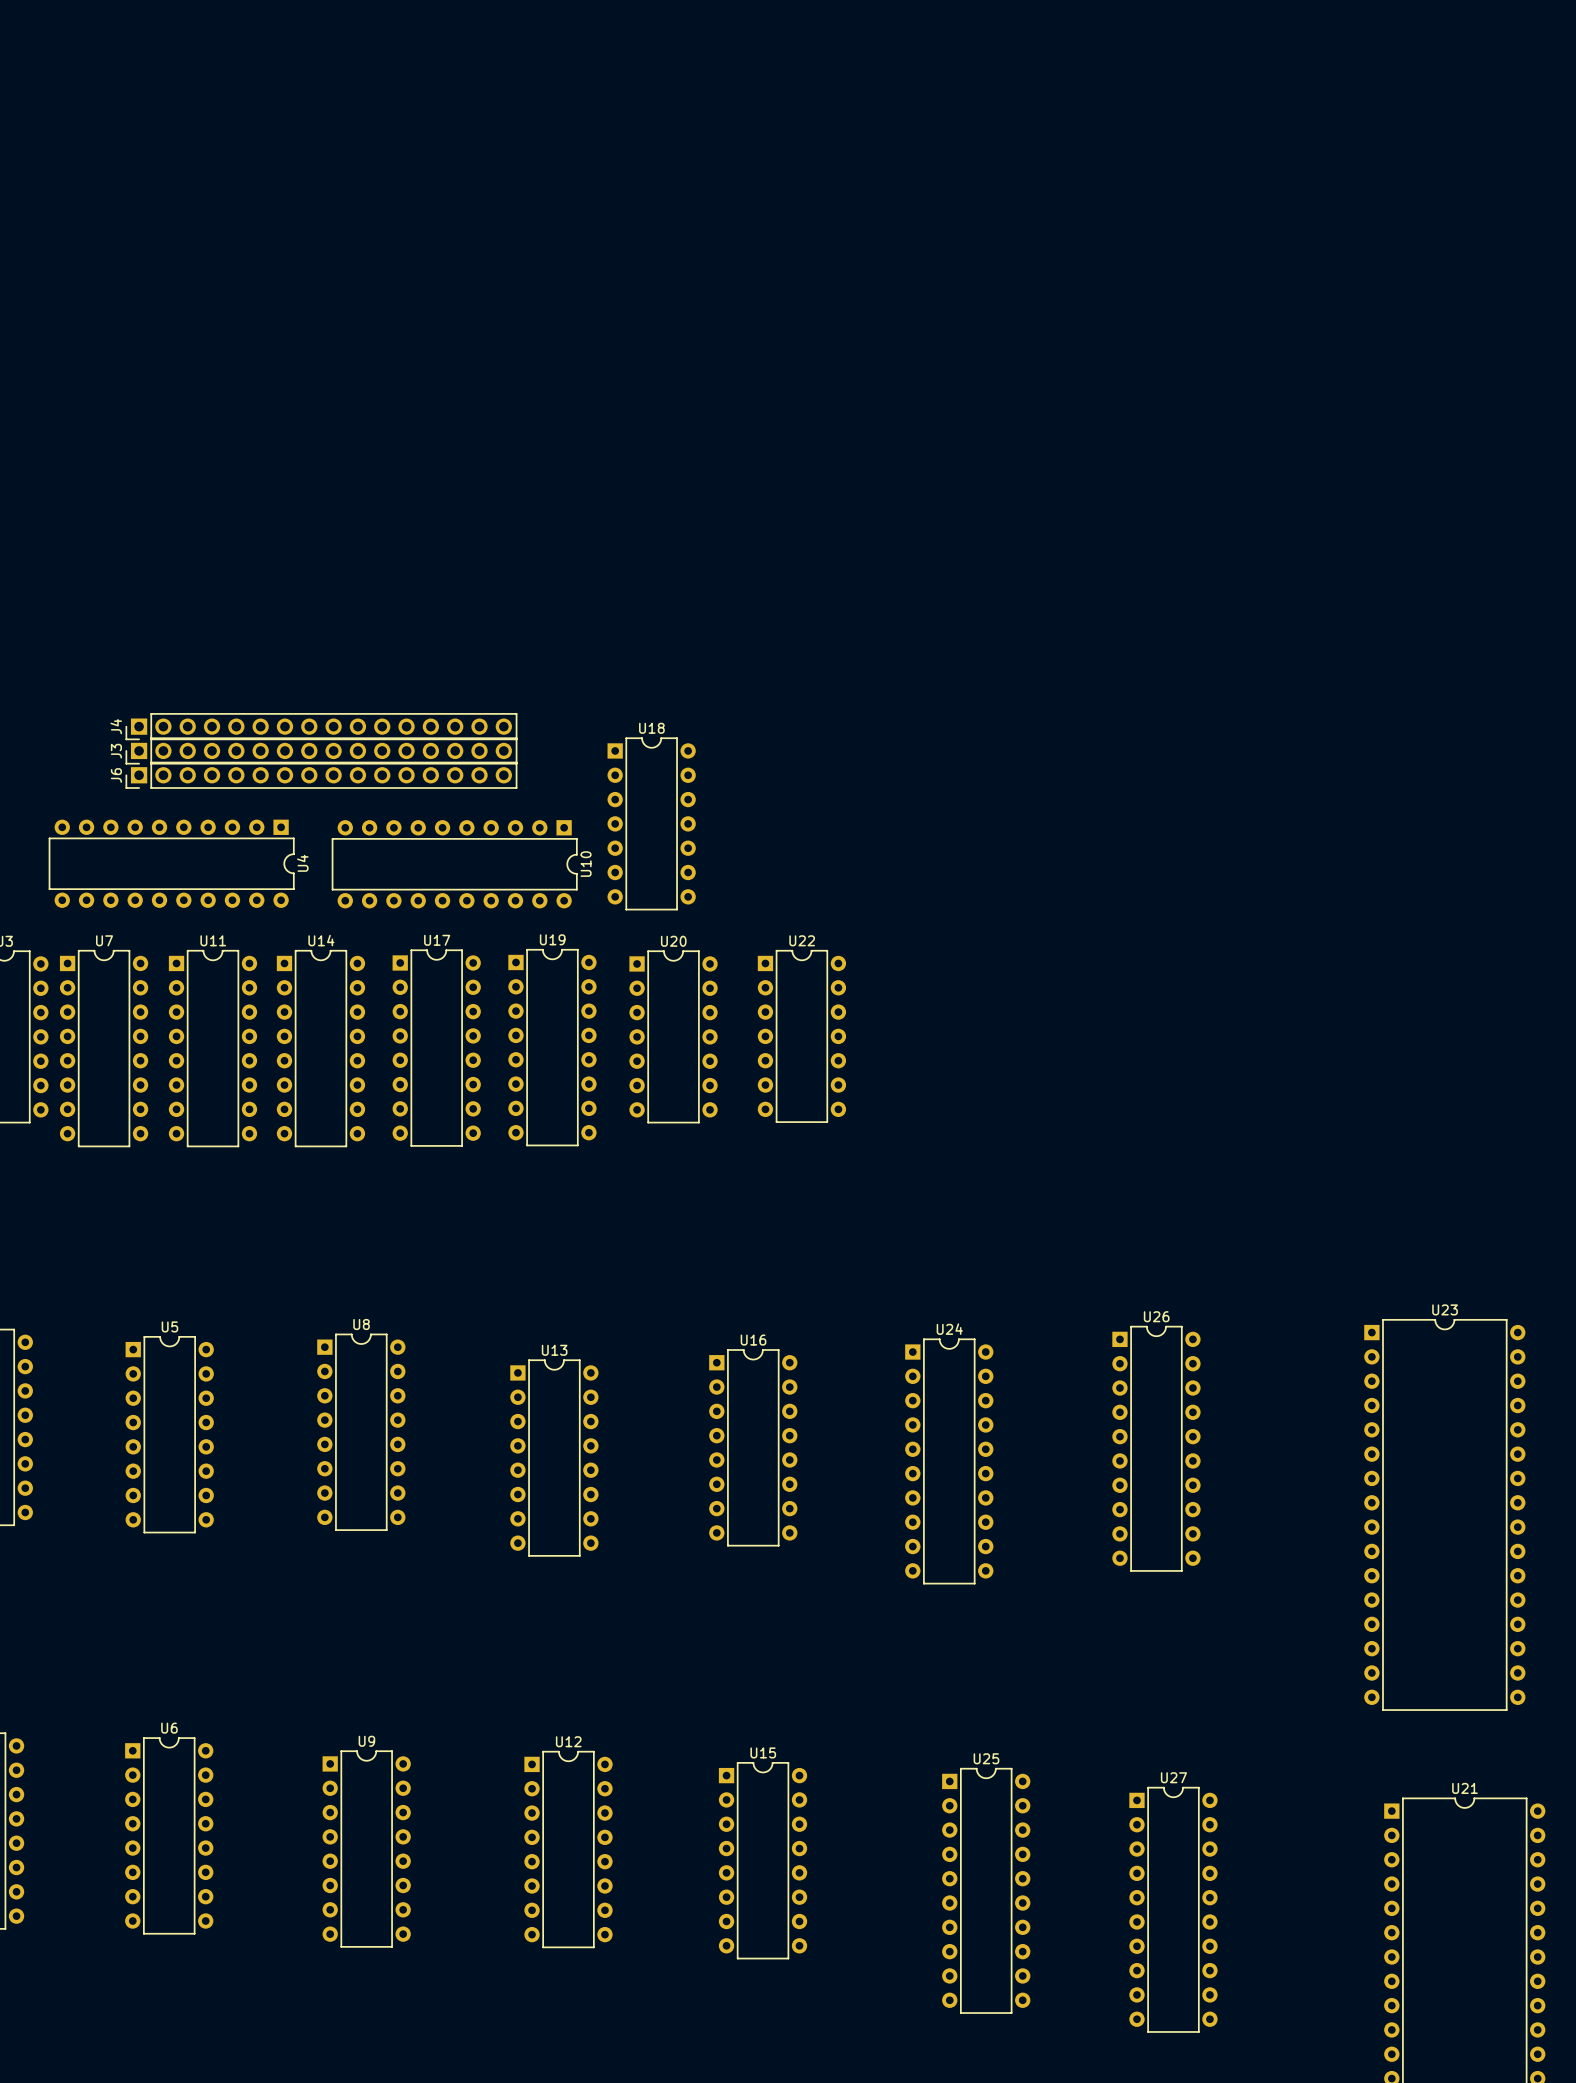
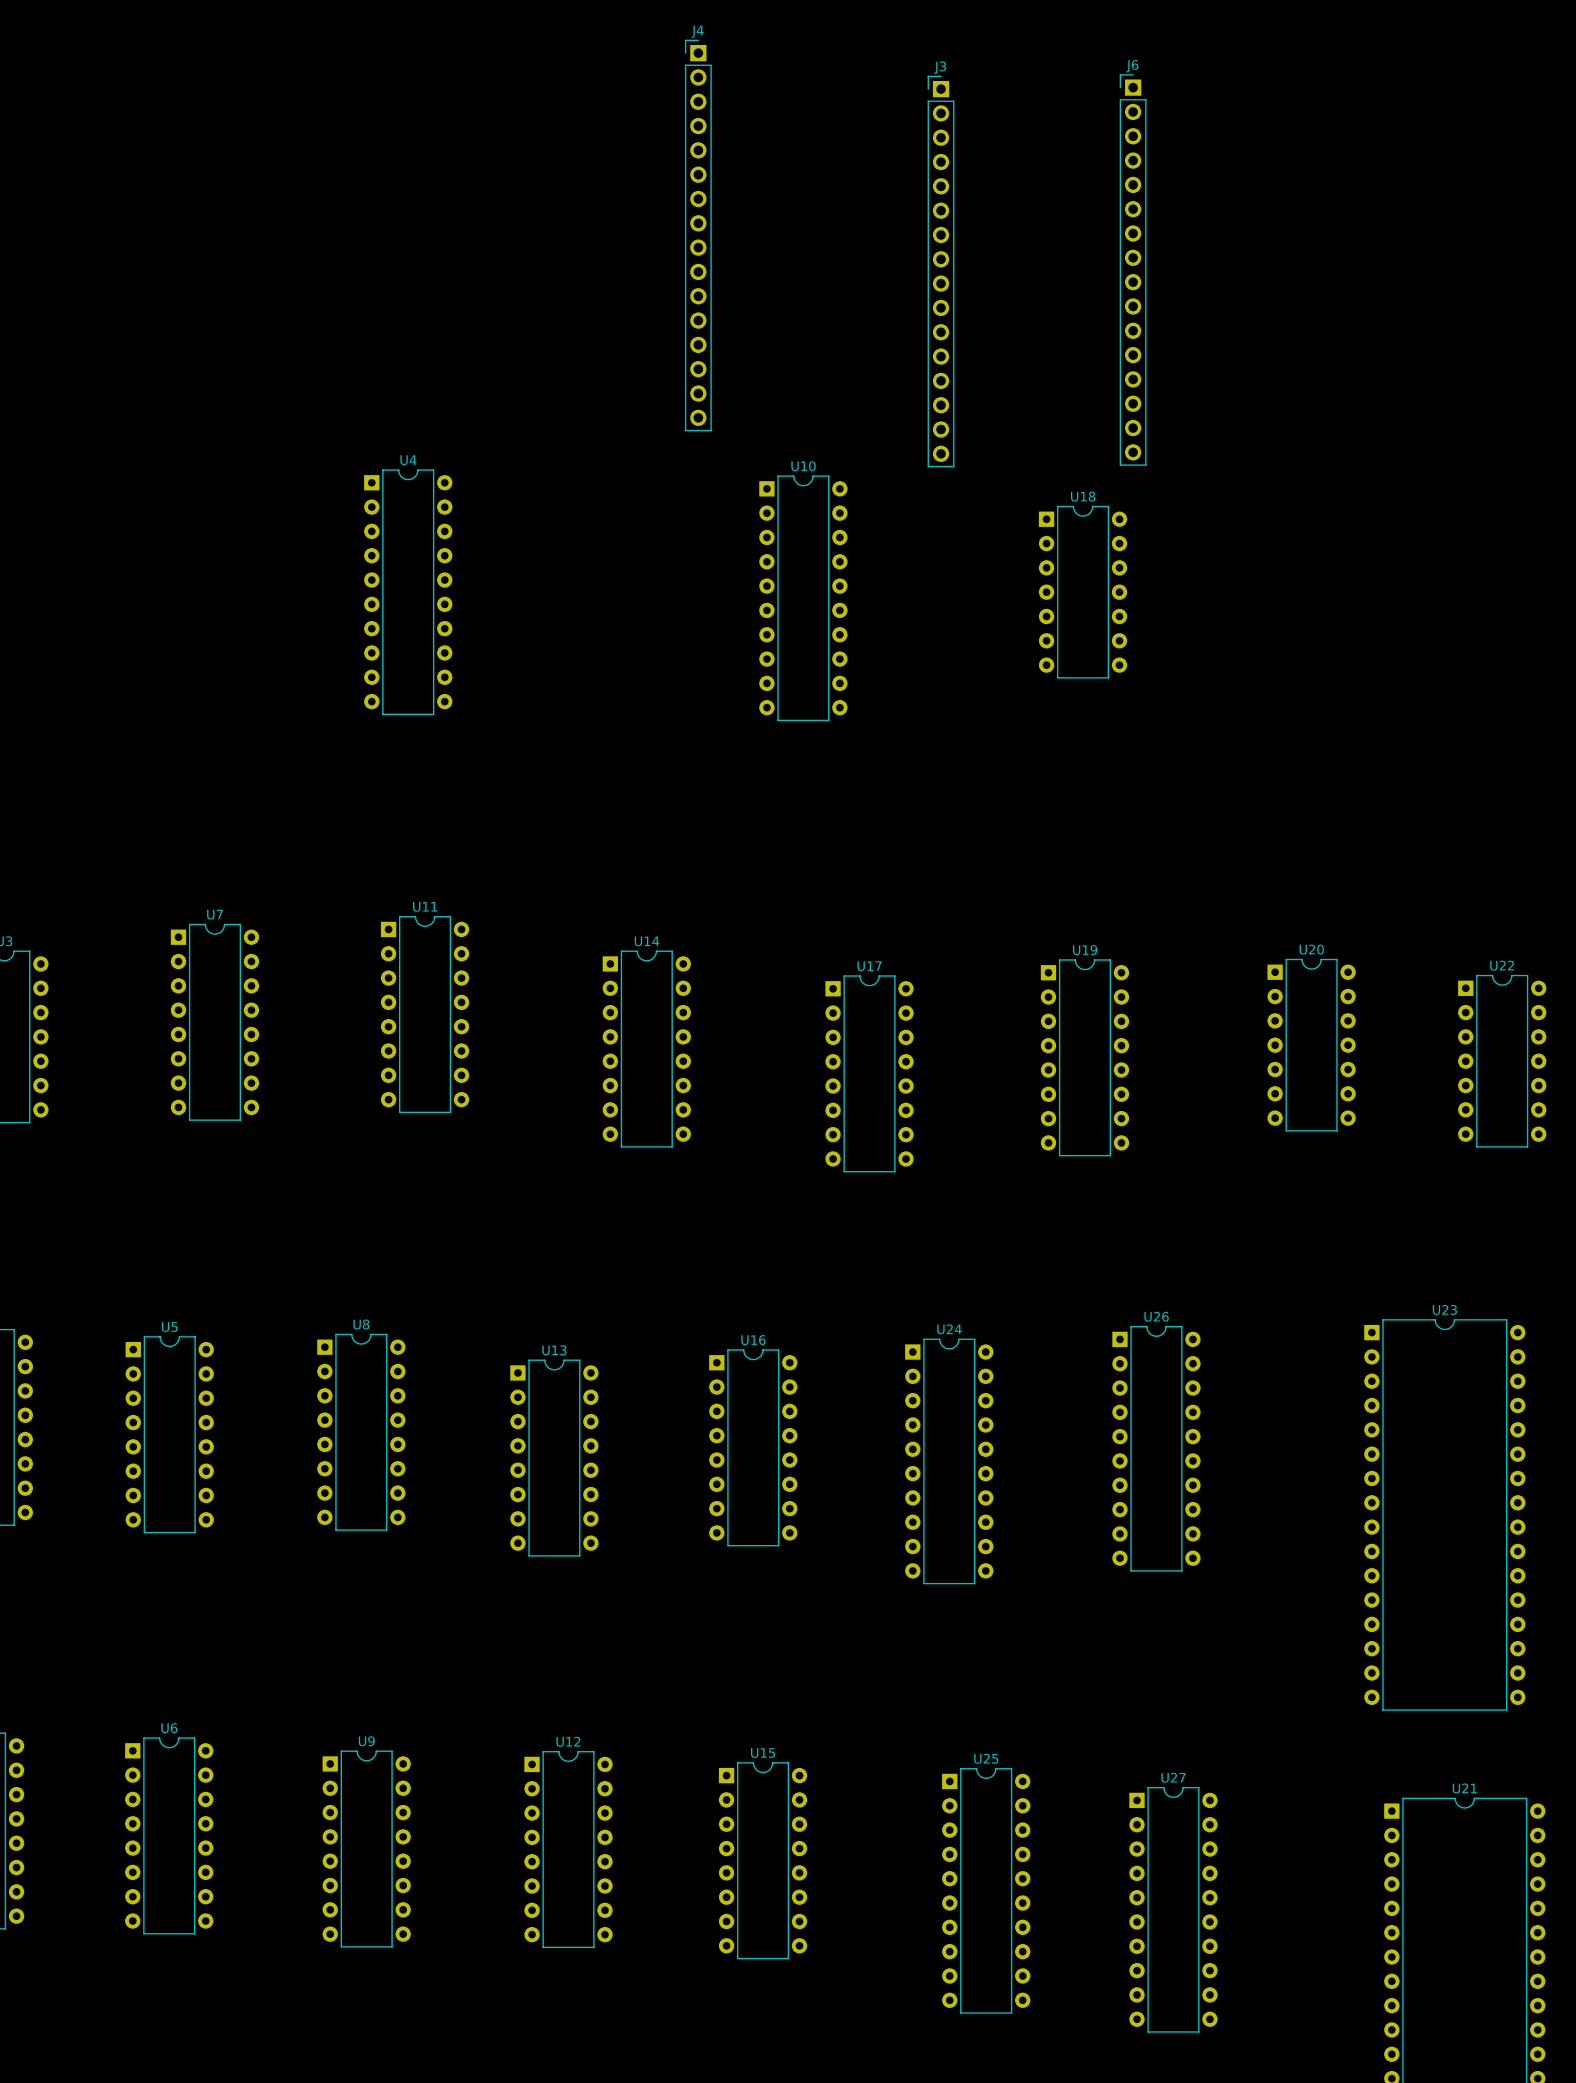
J4 rotation: 0° (321, 726) -> 90° clockwise (698, 235)
J4 position: (321, 726) -> (698, 235)
J3 rotation: 0° (321, 750) -> 90° clockwise (941, 271)
J3 position: (321, 750) -> (941, 271)
J6 rotation: 0° (321, 775) -> 90° clockwise (1133, 269)
J6 position: (321, 775) -> (1133, 269)
U18 position: (651, 823) -> (1083, 592)
U4 rotation: 0° (171, 863) -> 90° counterclockwise (408, 592)
U4 position: (171, 863) -> (408, 592)
U10 rotation: 0° (454, 864) -> 90° counterclockwise (803, 598)
U10 position: (454, 864) -> (803, 598)
U20 position: (673, 1036) -> (1311, 1045)
U22 position: (801, 1036) -> (1502, 1061)
U19 position: (552, 1047) -> (1084, 1057)
U7 position: (104, 1048) -> (214, 1022)
U11 position: (213, 1048) -> (425, 1014)
U14 position: (320, 1048) -> (646, 1049)
U17 position: (436, 1048) -> (869, 1073)

